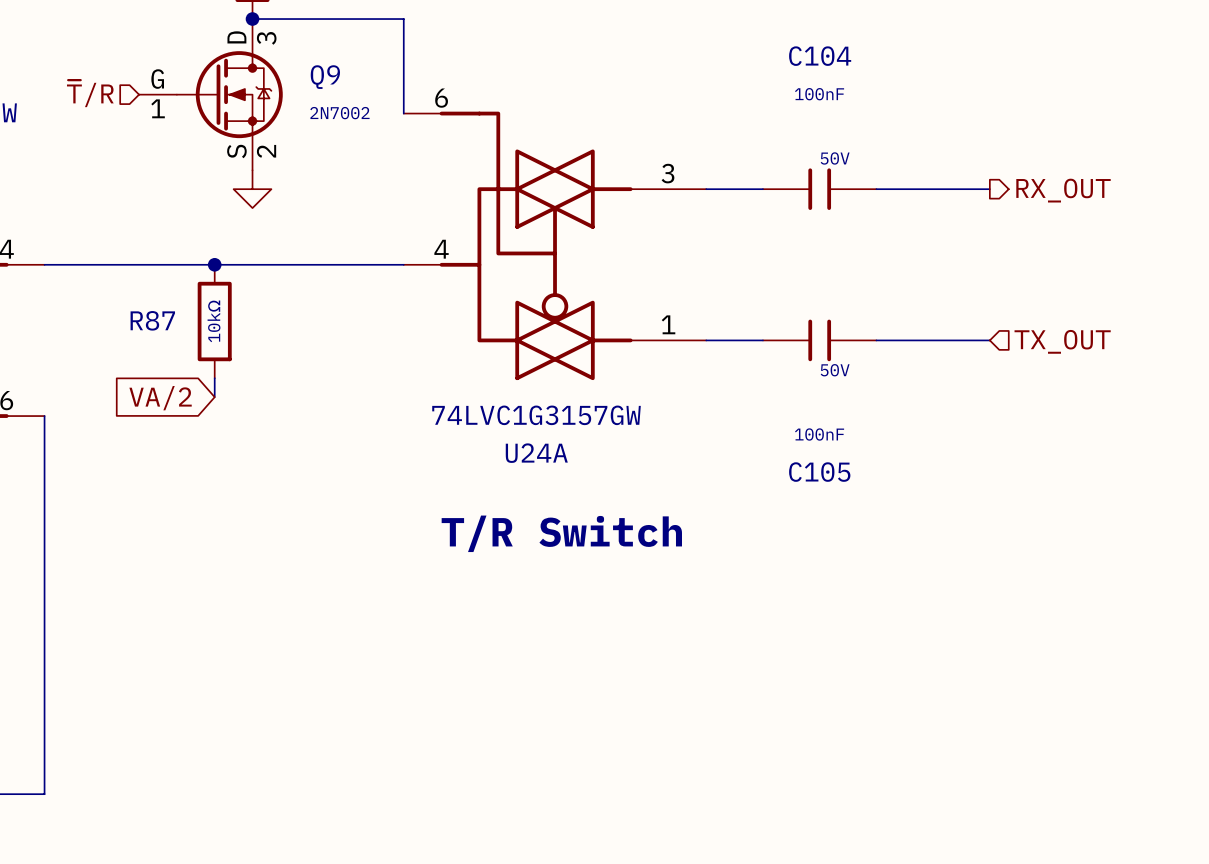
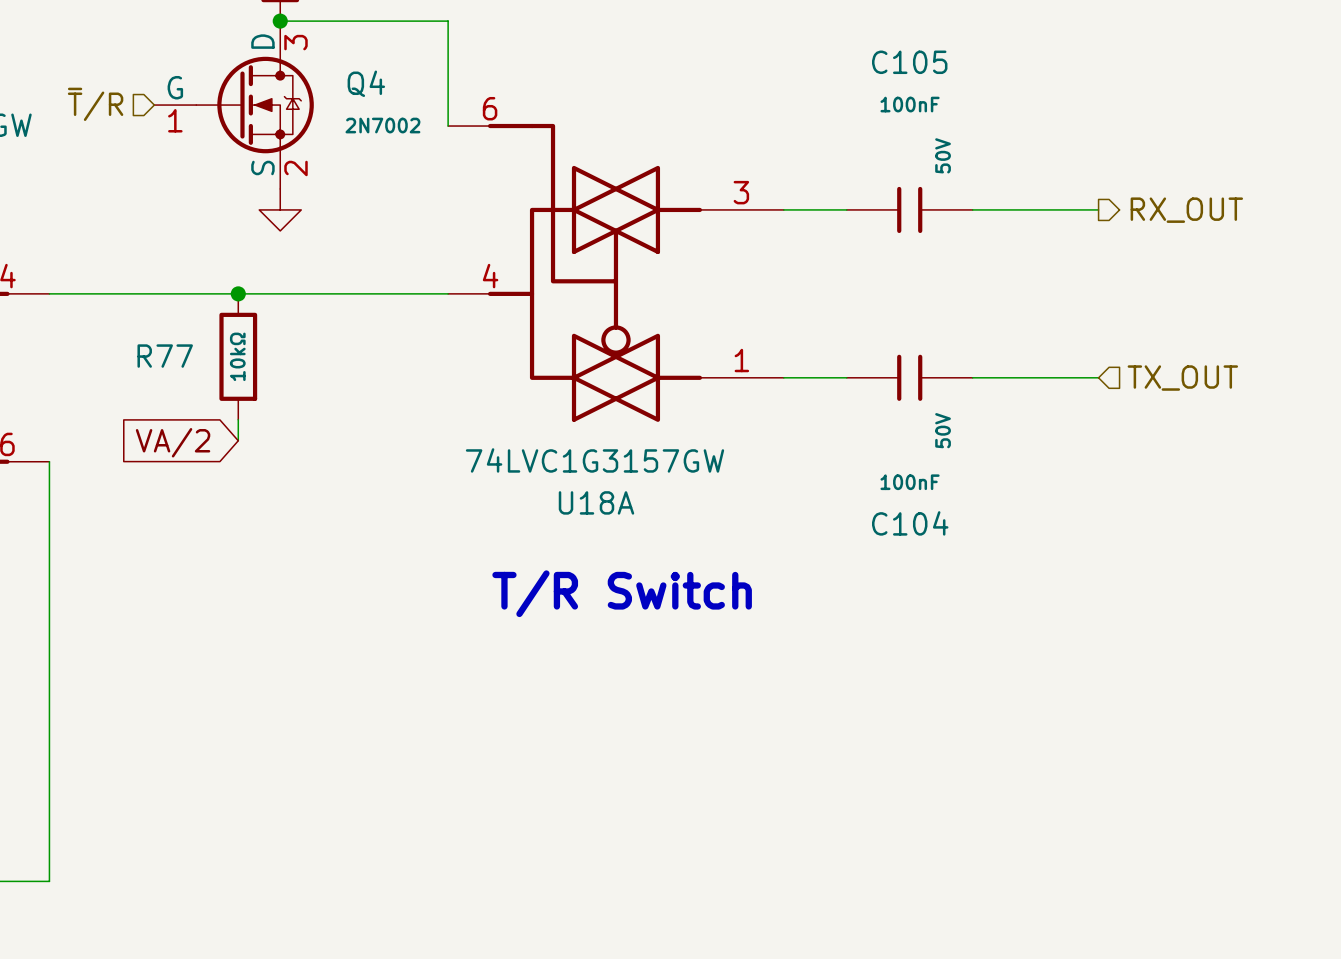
C104 name: C104 (820, 56) -> C105 (909, 62)
Q9 name: Q9 (325, 77) -> Q4 (366, 83)
C104 text rotation: 0° (835, 158) -> 90° counterclockwise (943, 155)
R87 name: R87 (152, 320) -> R77 (165, 356)
C105 text rotation: 0° (835, 370) -> 90° counterclockwise (943, 430)
U24A name: U24A (536, 453) -> U18A (596, 502)
C105 name: C105 (819, 472) -> C104 (910, 523)

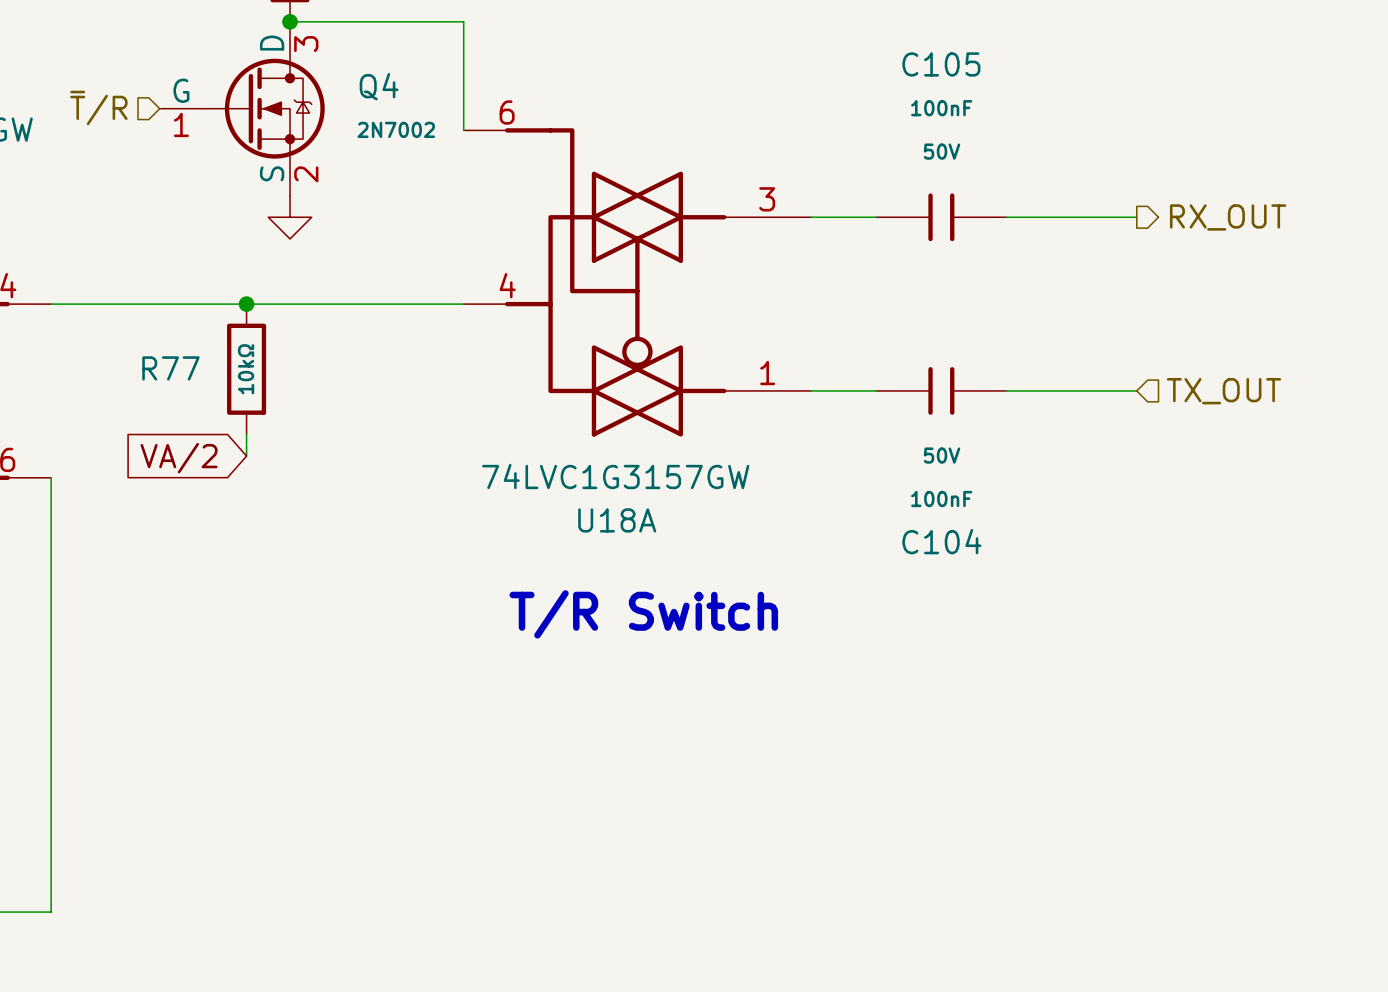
C105 text rotation: 0° (943, 155) -> 90° clockwise (942, 151)
C104 text rotation: 0° (943, 430) -> 90° clockwise (942, 455)

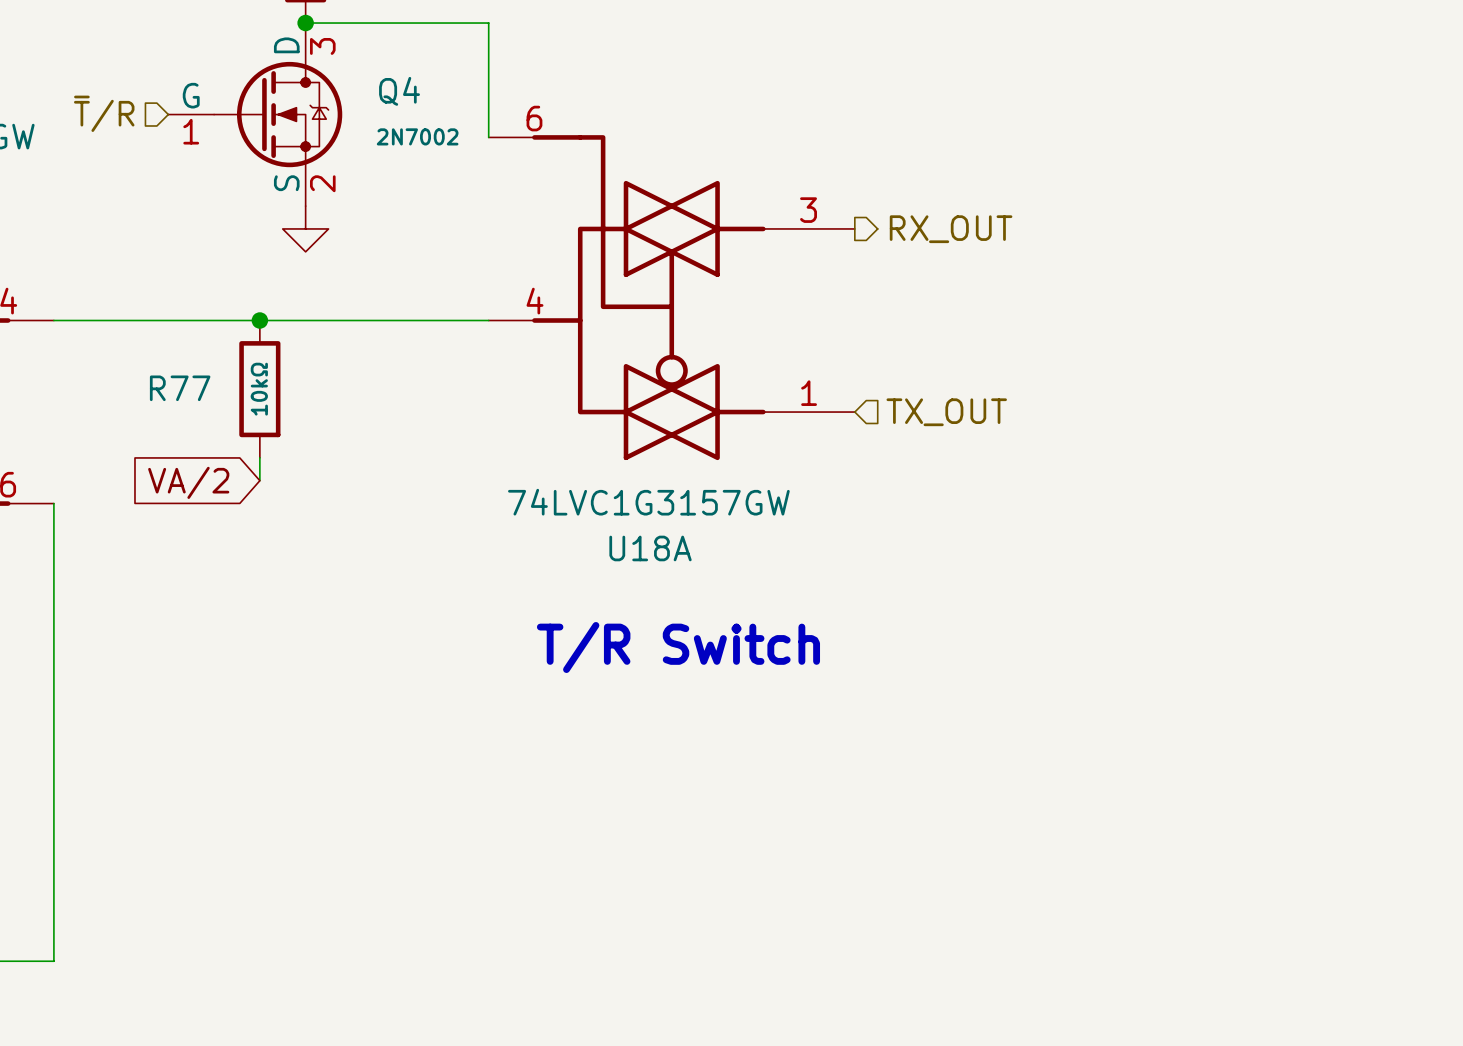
wire: (811, 217) (876, 217) -> none
C105: 100nF (941, 217) -> none
wire: (1006, 217) (1136, 217) -> none
hierarchical label position: RX_OUT (1228, 217) -> RX_OUT (951, 229)
wire: (811, 390) (876, 390) -> none
C104: 100nF (941, 390) -> none
wire: (1006, 390) (1136, 390) -> none
hierarchical label position: TX_OUT (1223, 391) -> TX_OUT (946, 412)

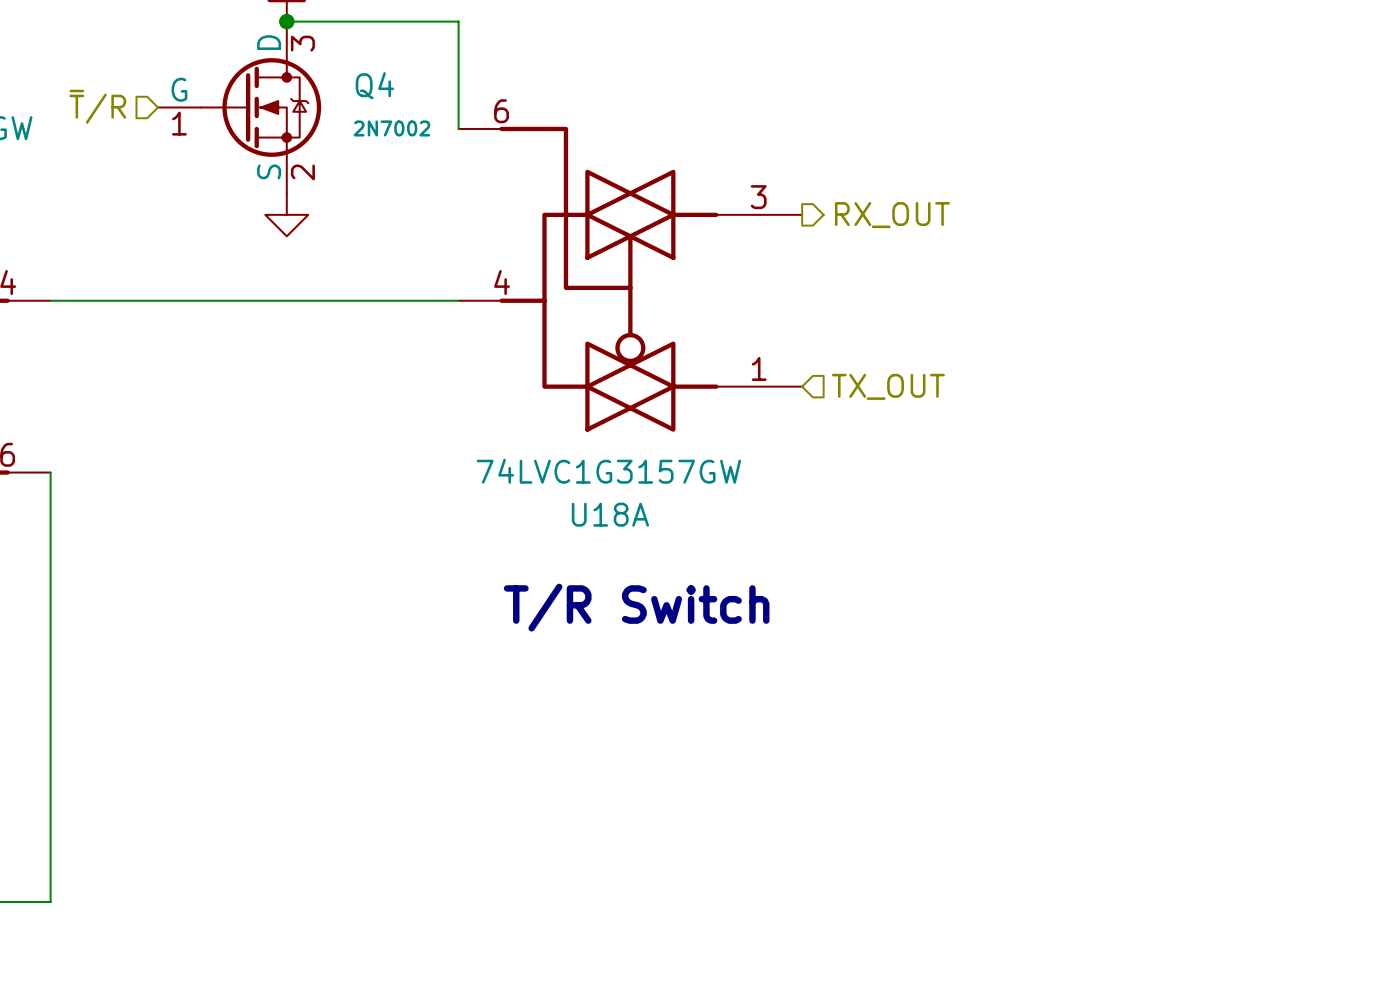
junction: (259, 320) -> none
R77: 10kΩ (259, 389) -> none
wire: (259, 457) (259, 480) -> none
global label: VA/2 (188, 482) -> none

